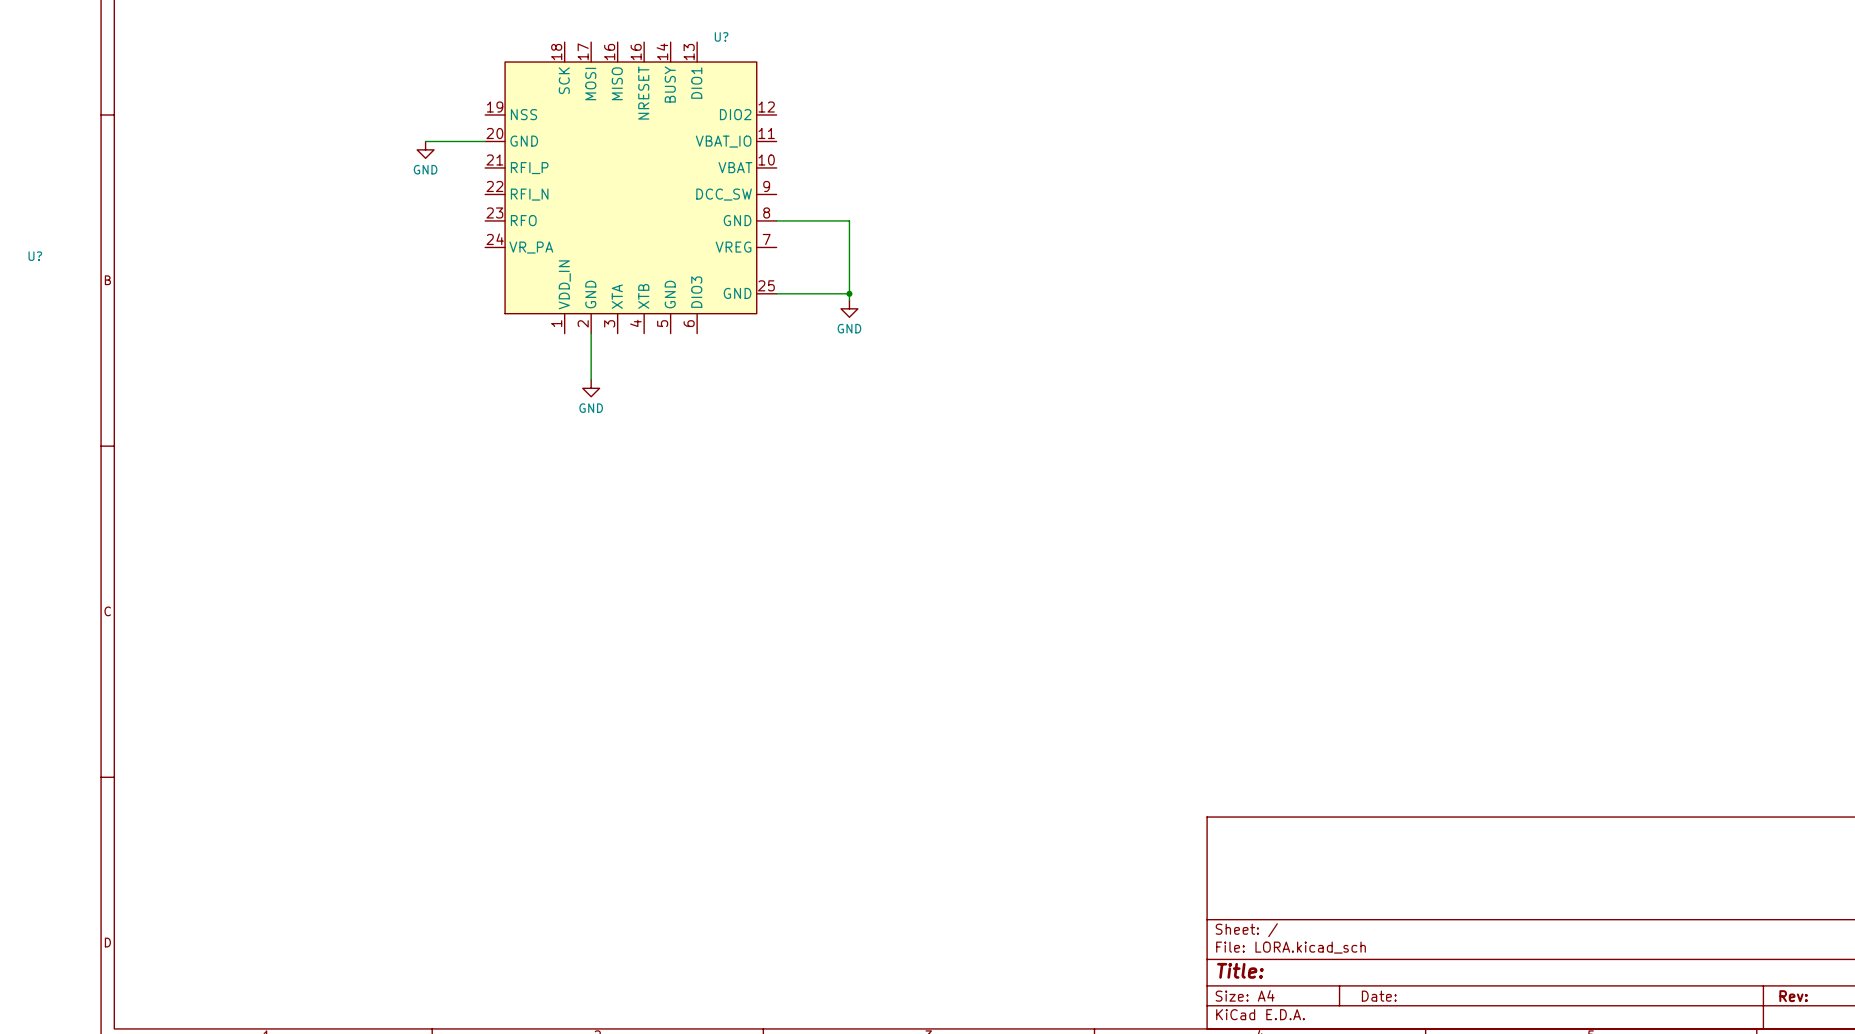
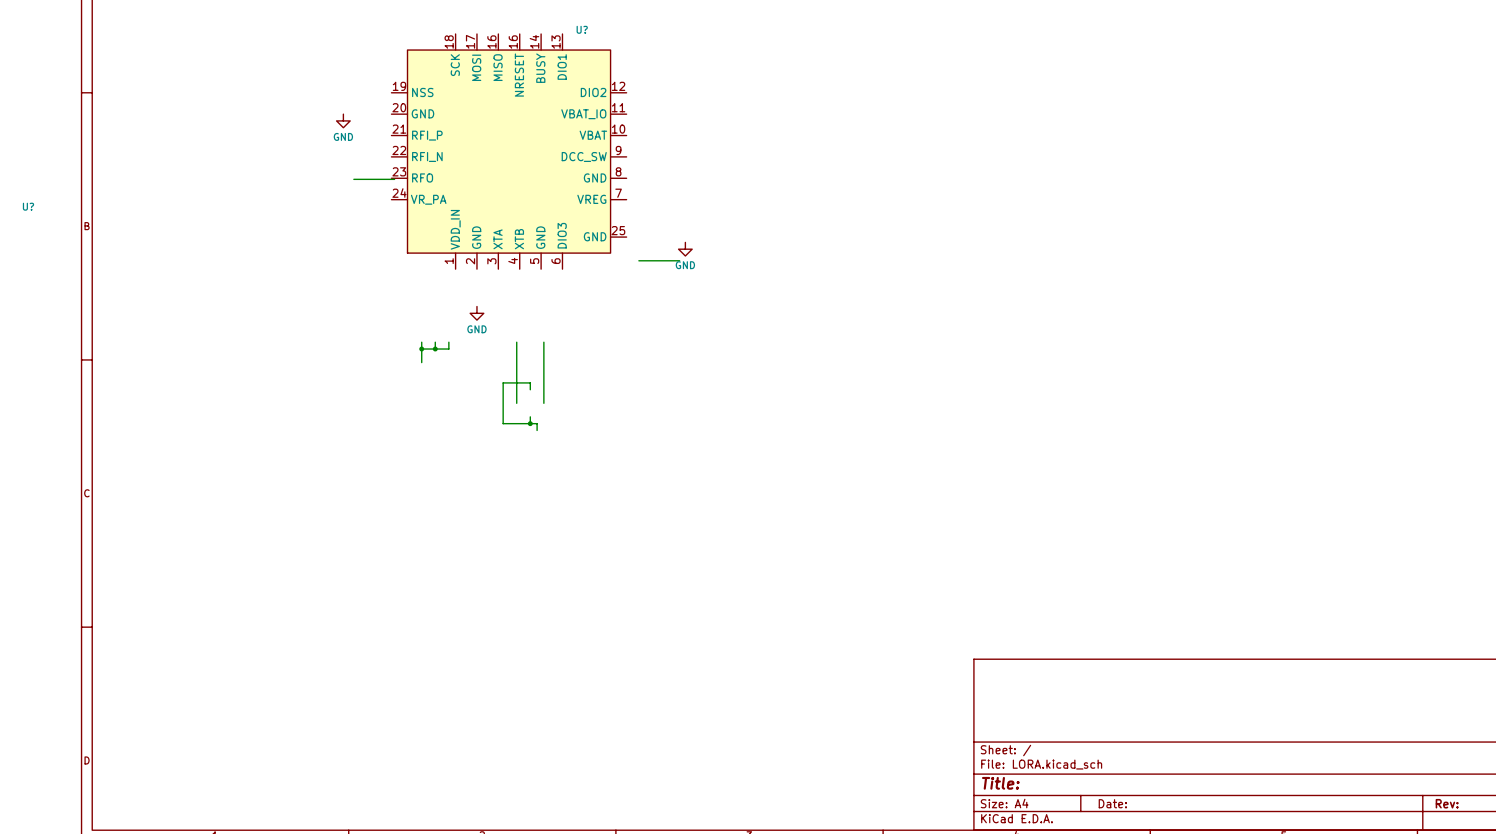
wire: (425, 141) (485, 141) -> none
wire: (776, 220) (849, 220) (849, 300) -> none
wire: none -> (353, 179) (394, 179)
wire: (776, 293) (849, 293) -> none
junction: (849, 293) -> none
wire: none -> (638, 260) (679, 260)
wire: (591, 333) (591, 379) -> none
wire: none -> (421, 342) (421, 362)
wire: none -> (435, 342) (435, 349)
wire: none -> (448, 342) (448, 349) (421, 349)
wire: none -> (516, 342) (516, 403)
wire: none -> (543, 342) (543, 403)
junction: none -> (421, 349)
junction: none -> (435, 349)
wire: none -> (530, 389) (530, 382) (503, 382) (503, 423) (537, 423) (537, 430)
wire: none -> (530, 416) (530, 423)
junction: none -> (530, 423)

